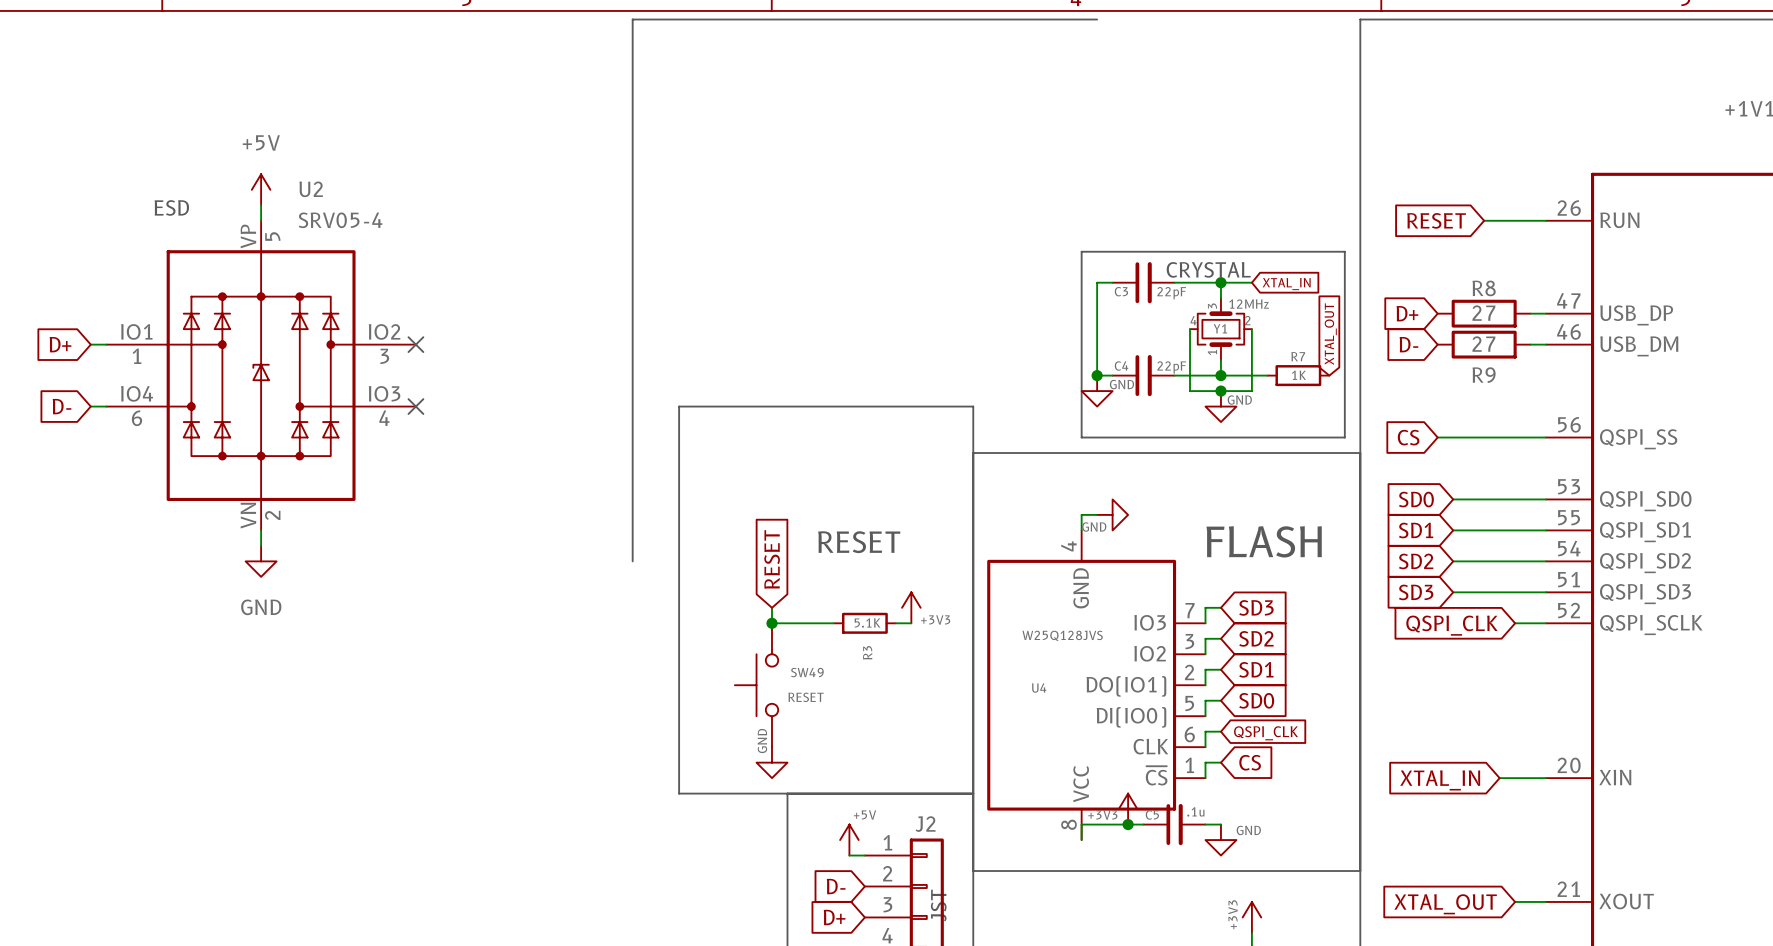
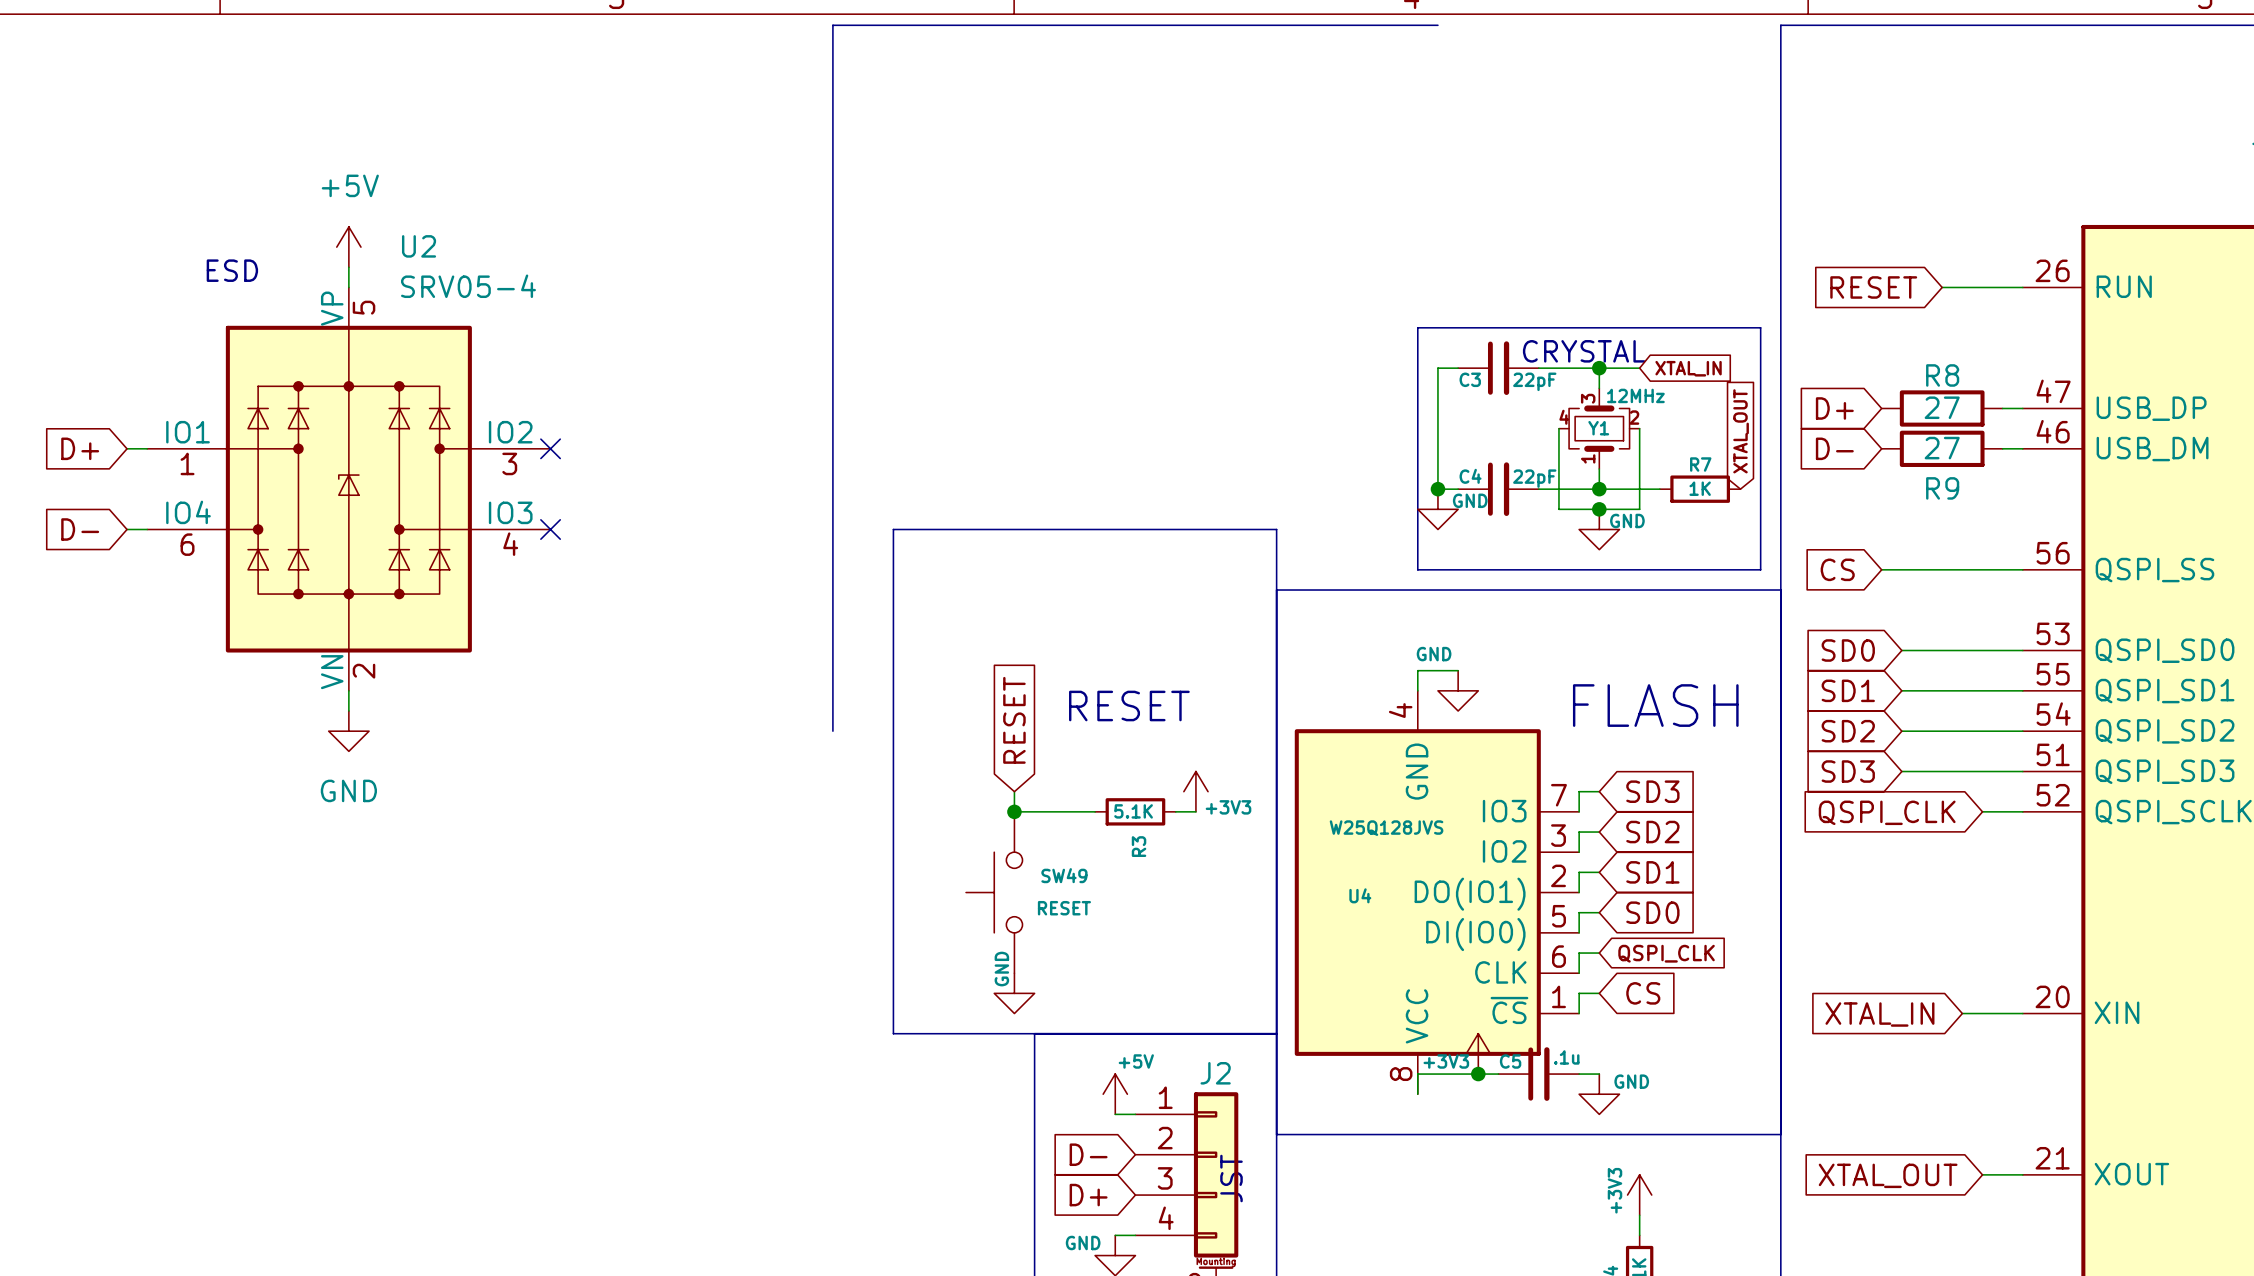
power symbol rotation: 0° (1112, 514) -> 90° clockwise (1458, 690)

